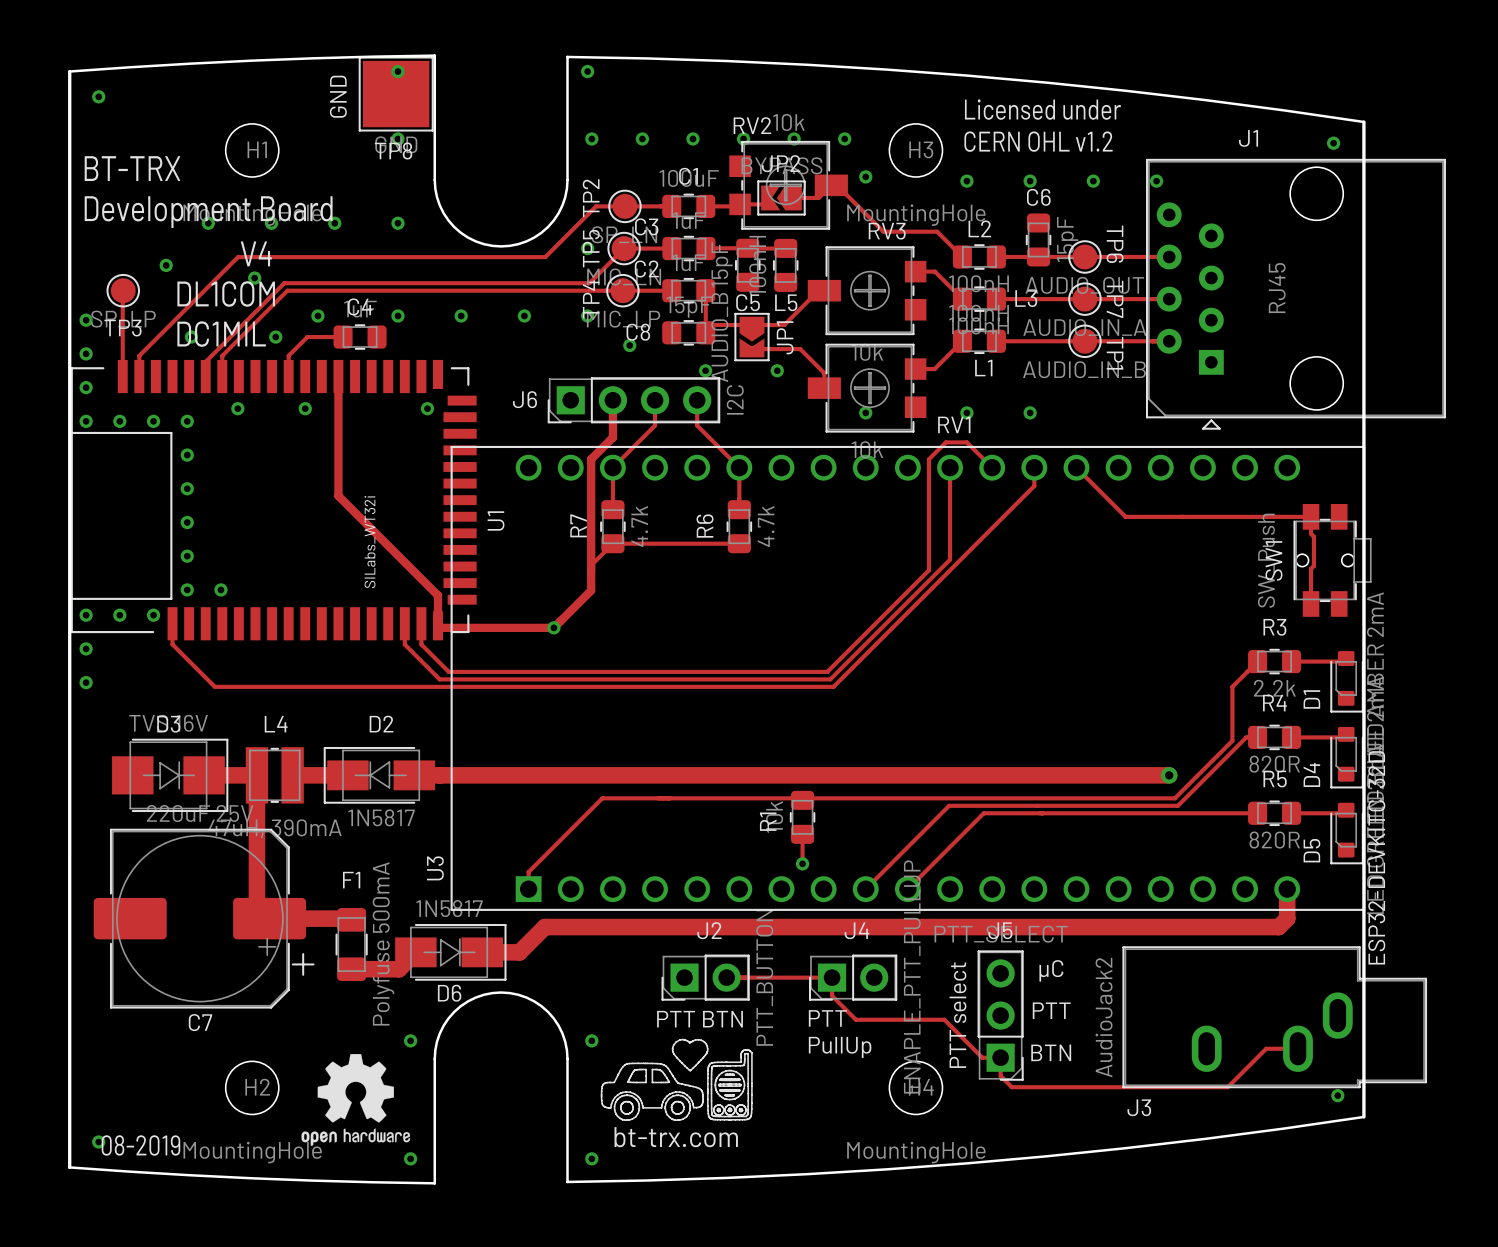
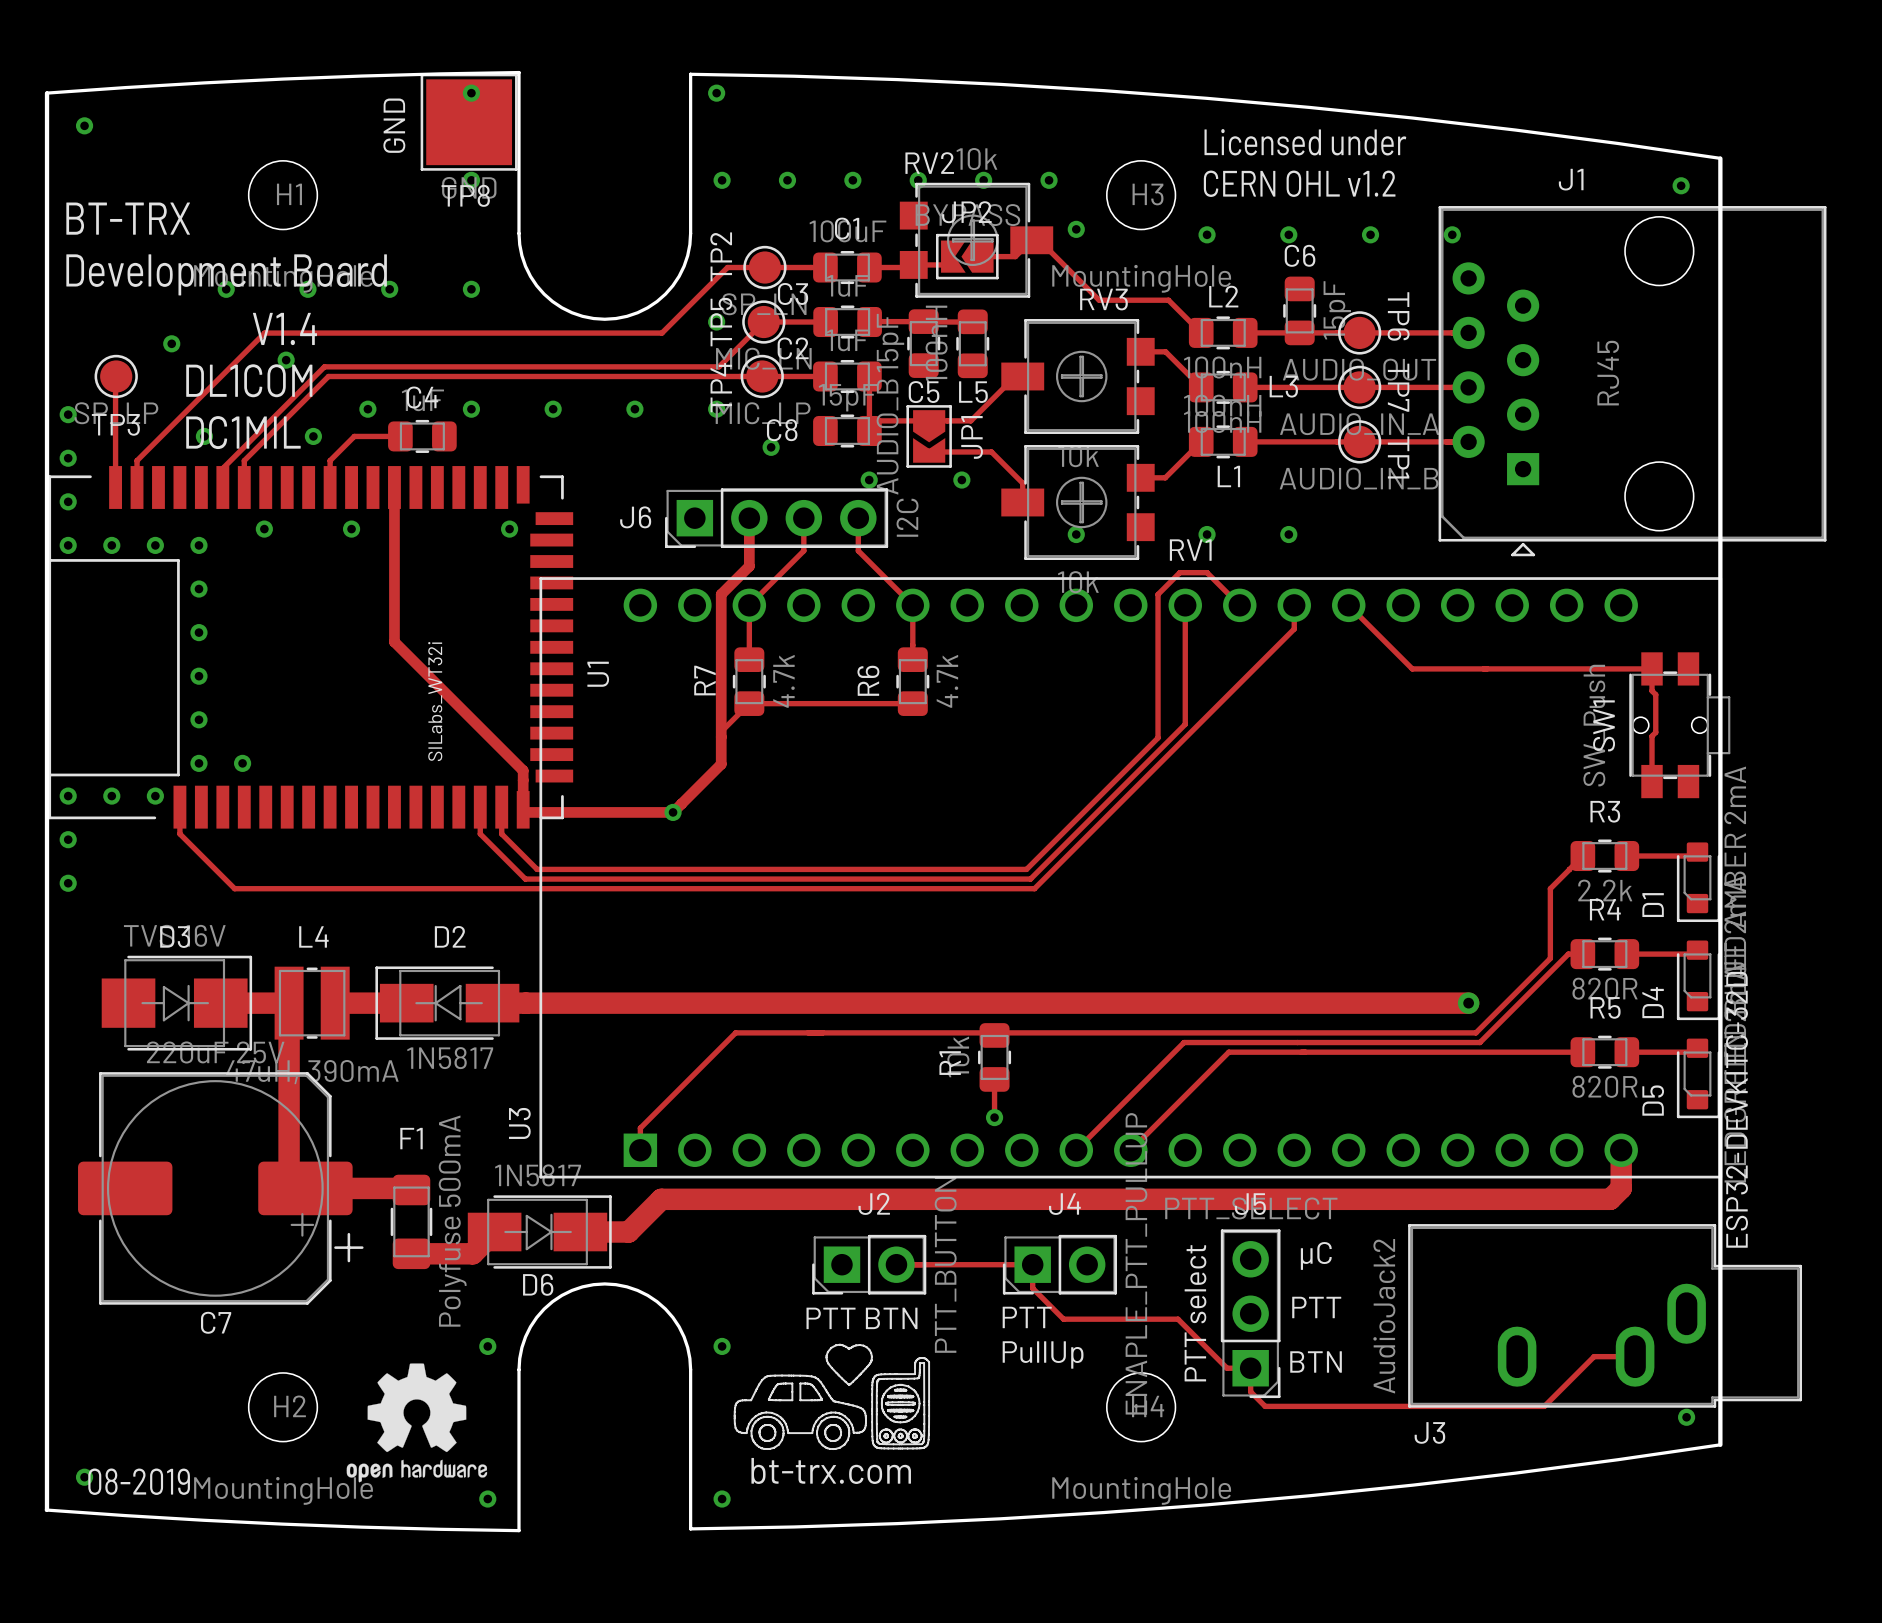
text: V4 (256, 253) -> V1.4 (284, 328)

